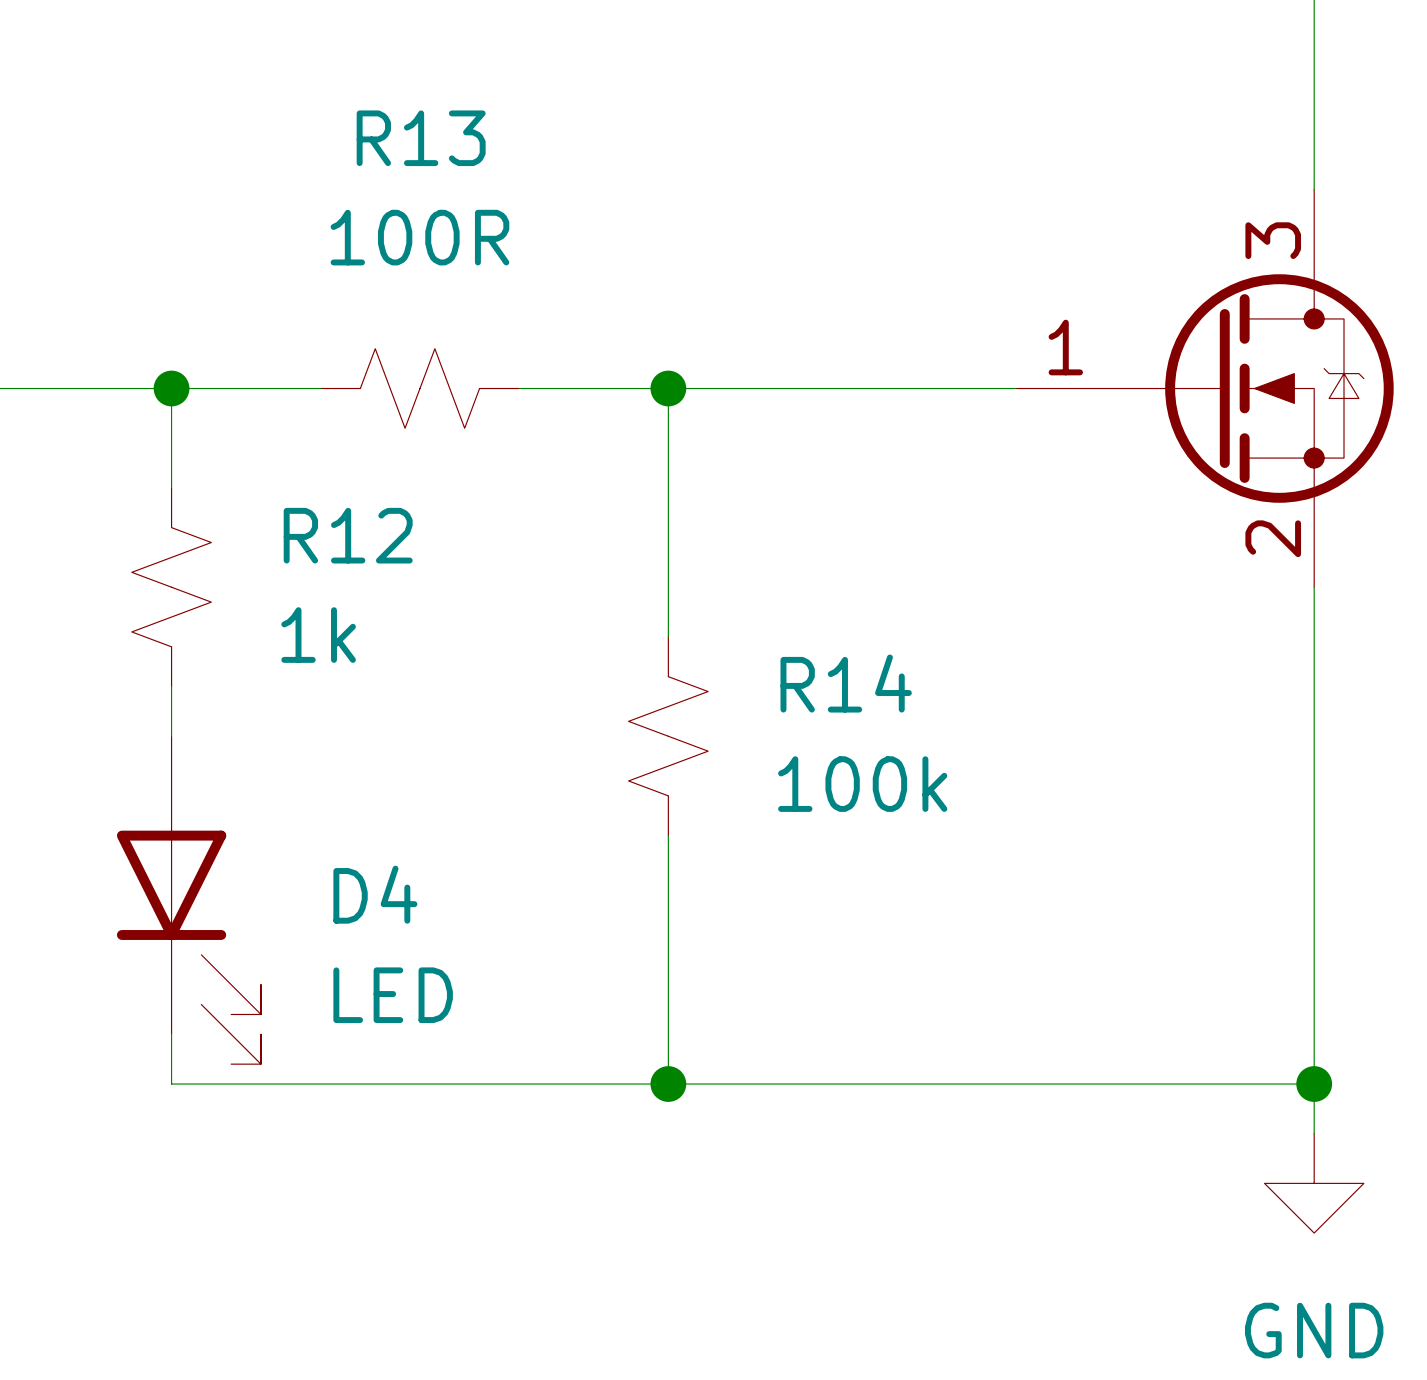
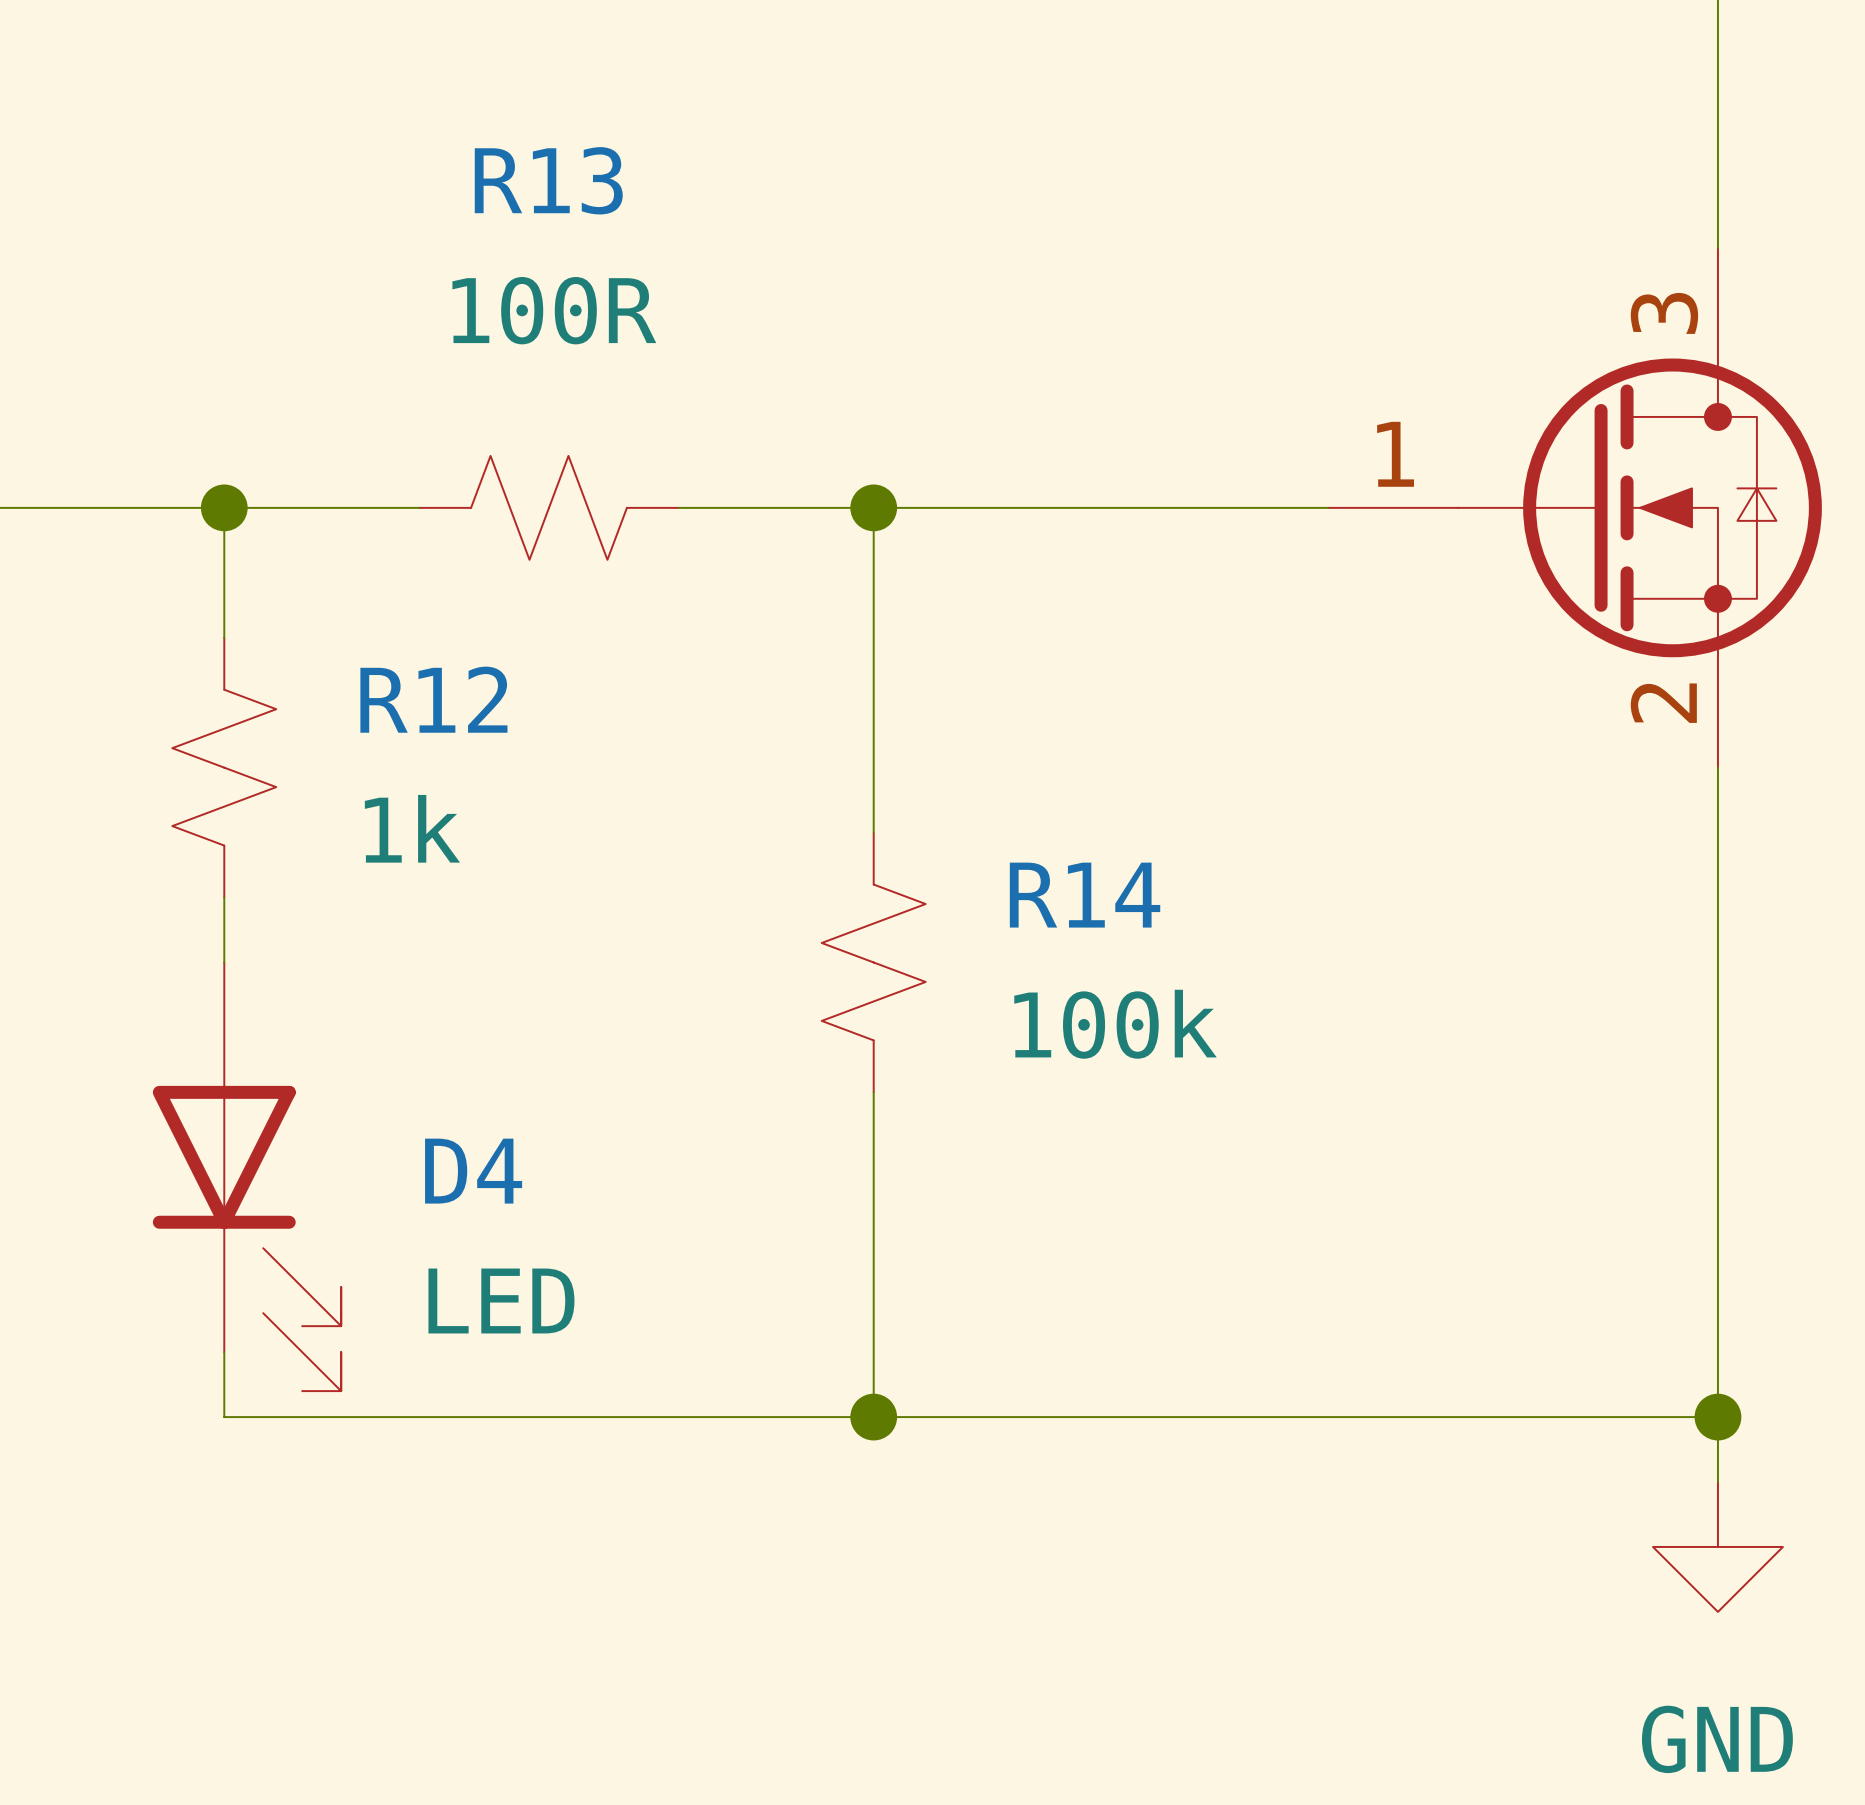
part symbol: [1016, 189, 1394, 588] -> [1328, 248, 1822, 768]

